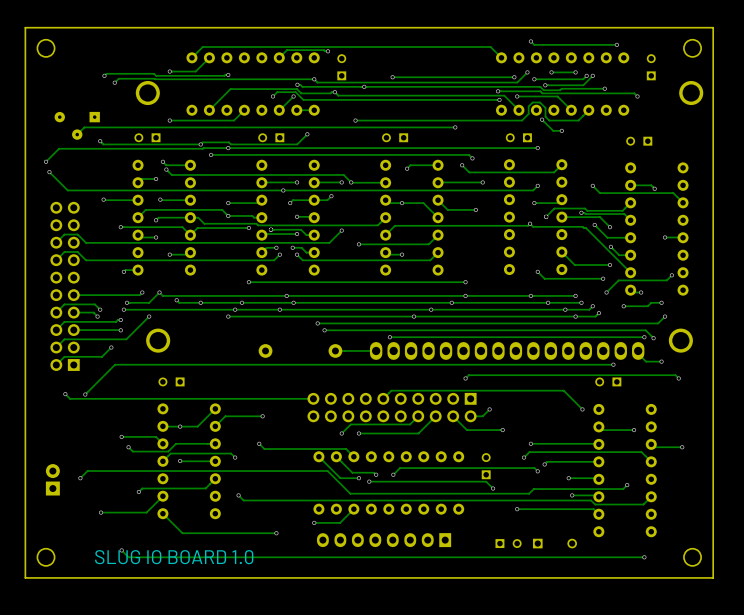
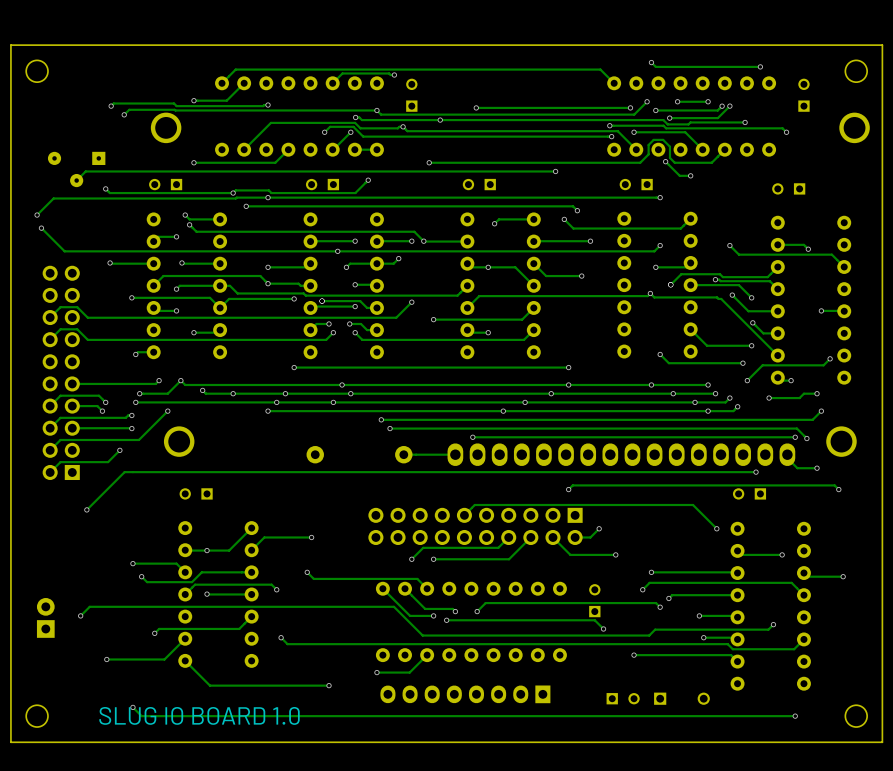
track: (65, 394) (70, 398) (313, 398) -> none
via: (65, 394) -> none

